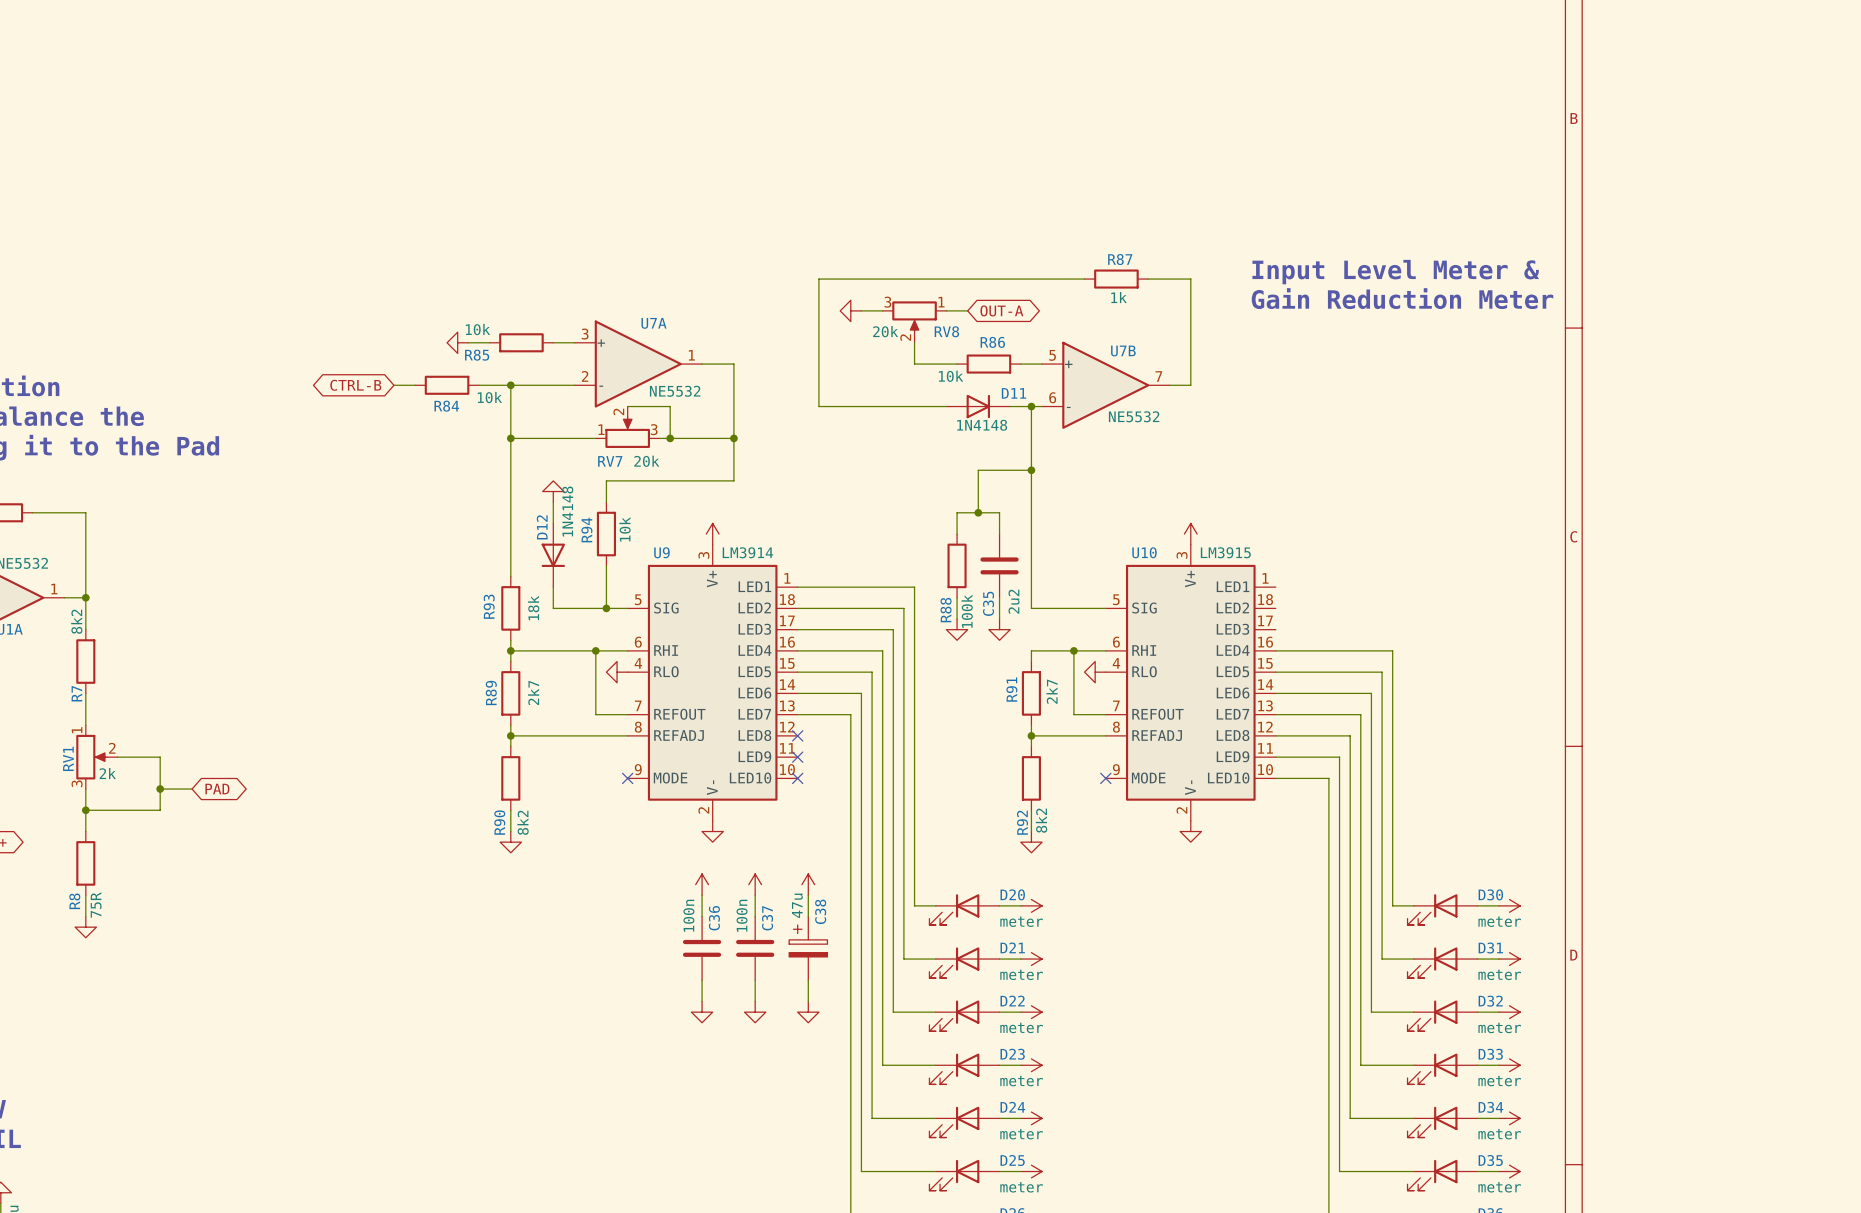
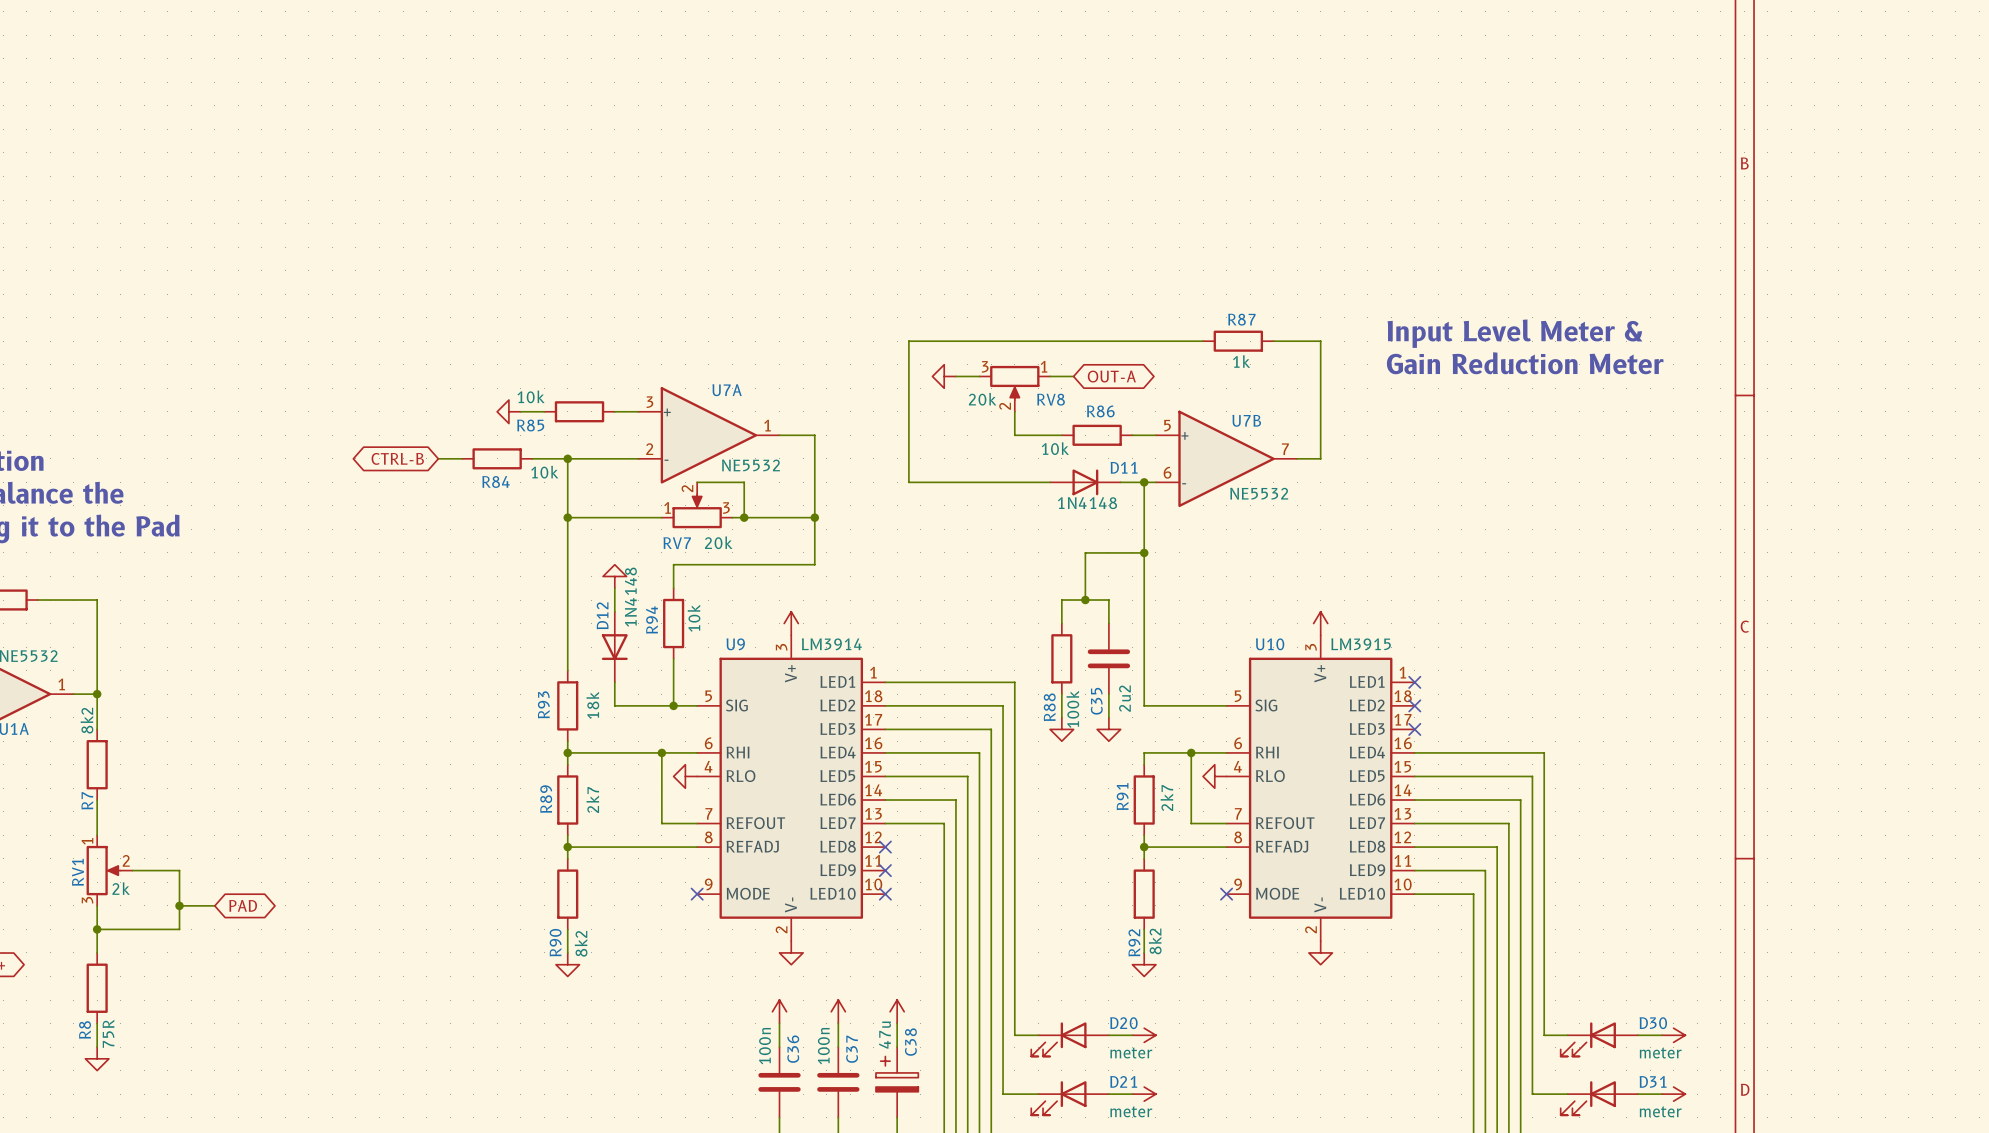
no-connect mark: none -> (1414, 682)
no-connect mark: none -> (1414, 705)
no-connect mark: none -> (1414, 729)

